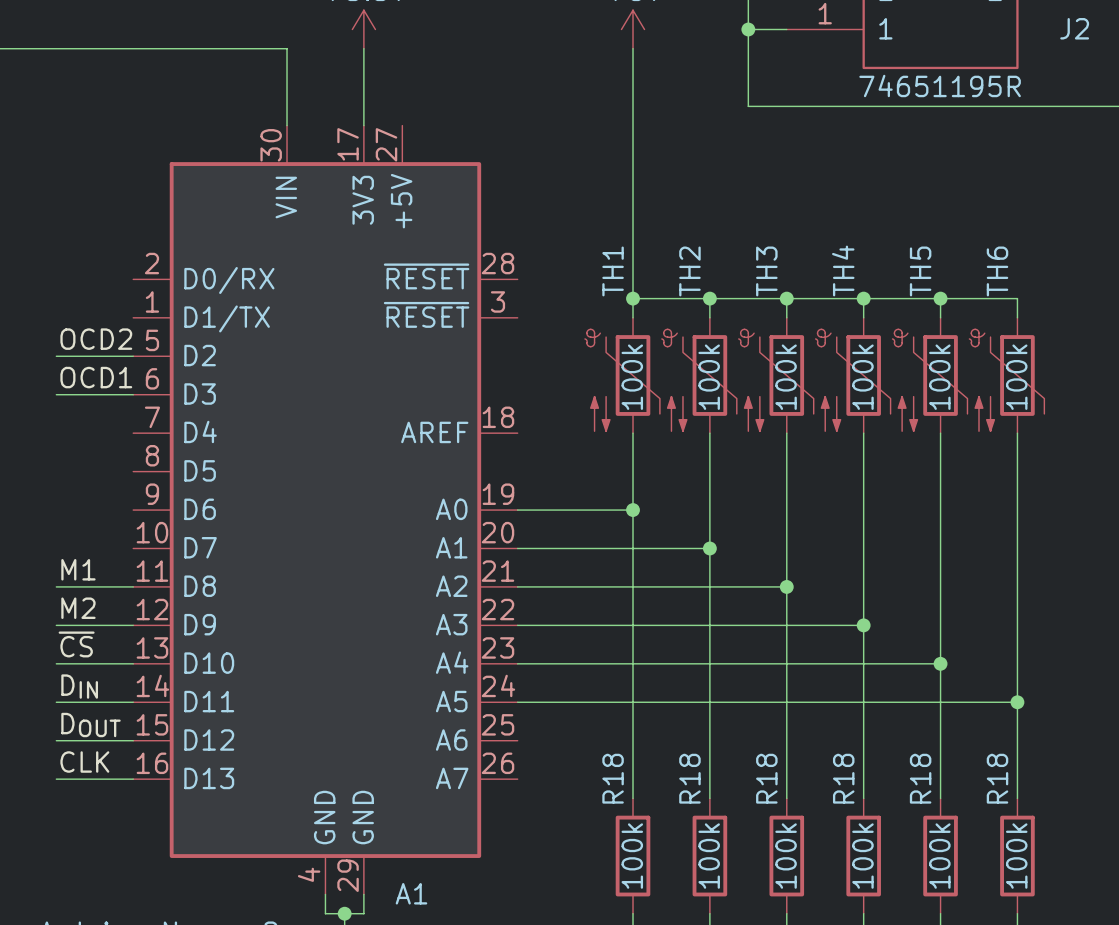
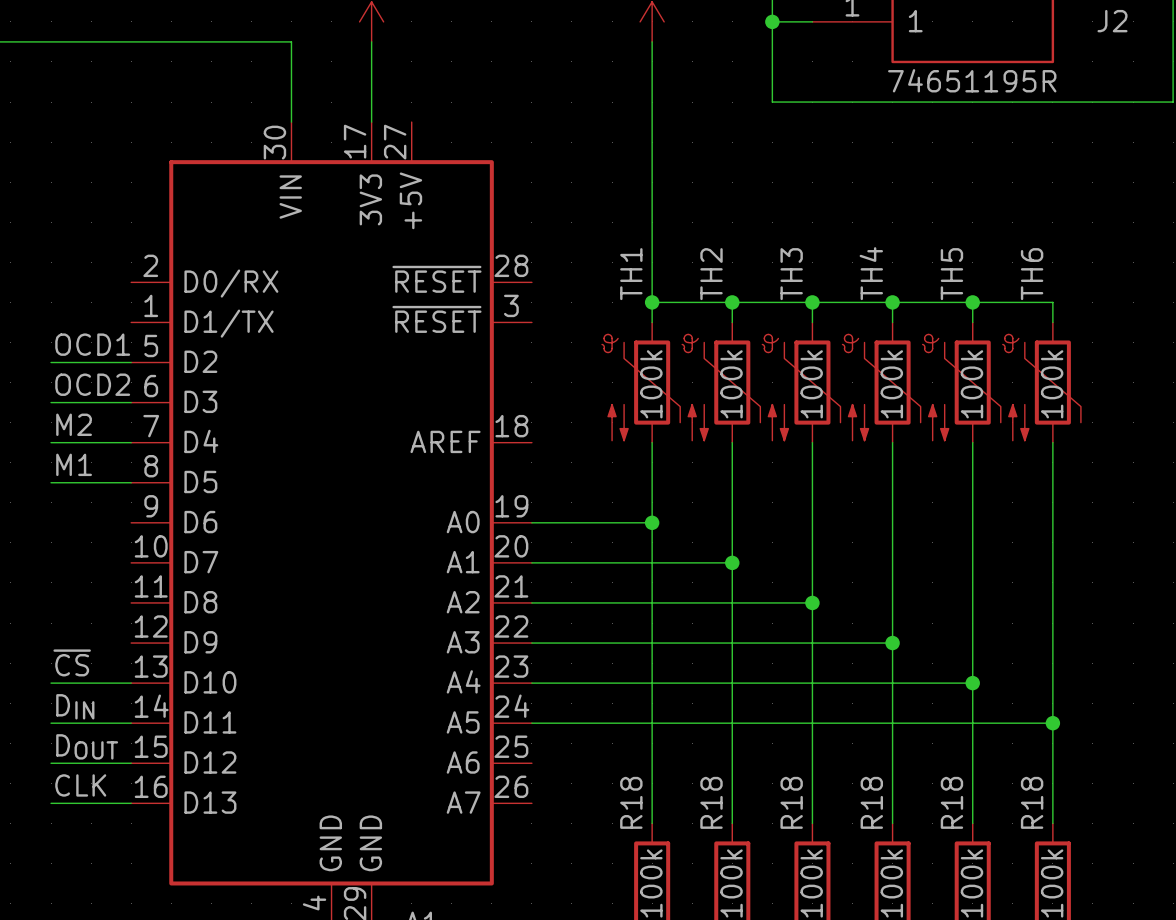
label: OCD2 (96, 339) -> OCD1 (92, 344)
label: OCD1 (96, 377) -> OCD2 (92, 384)
label position: M1 (78, 569) -> M1 (74, 464)
wire: (56, 586) (133, 586) -> (51, 482) (131, 482)
label position: M2 (78, 608) -> M2 (74, 424)
wire: (56, 625) (133, 625) -> (51, 442) (131, 442)

